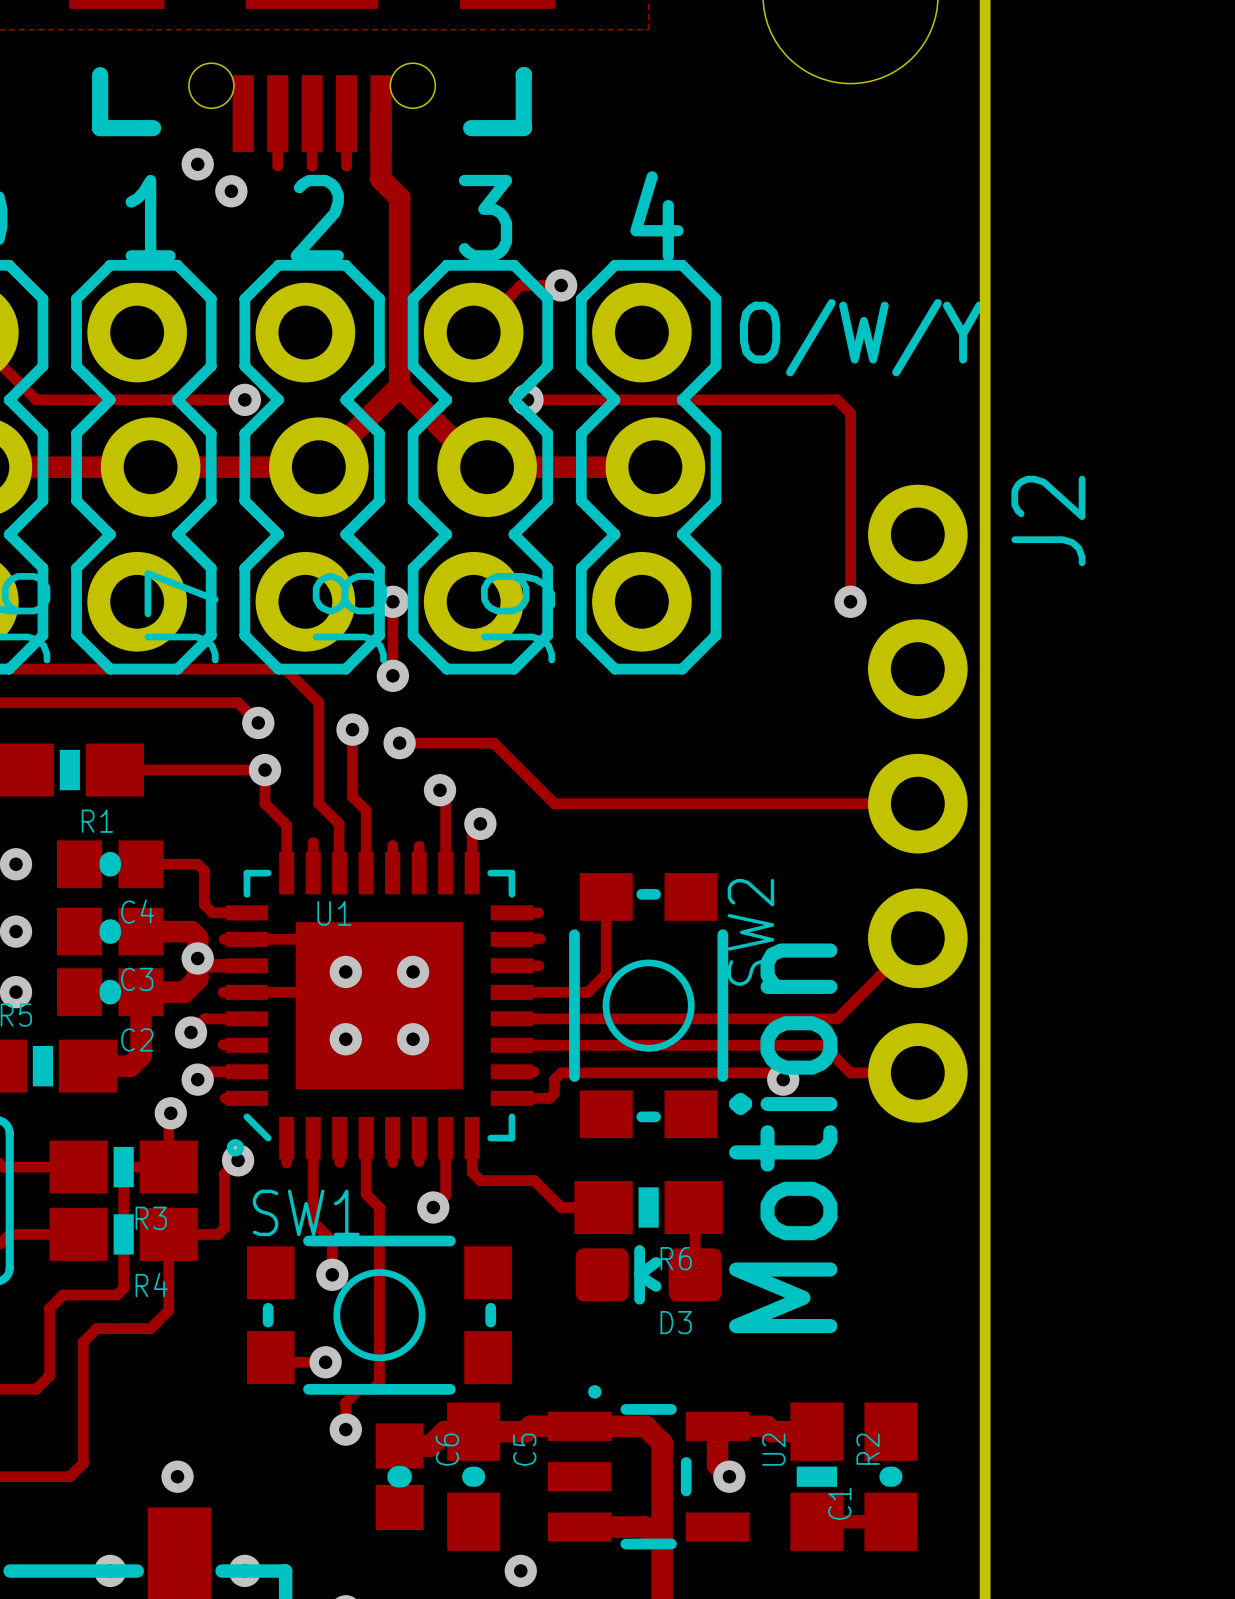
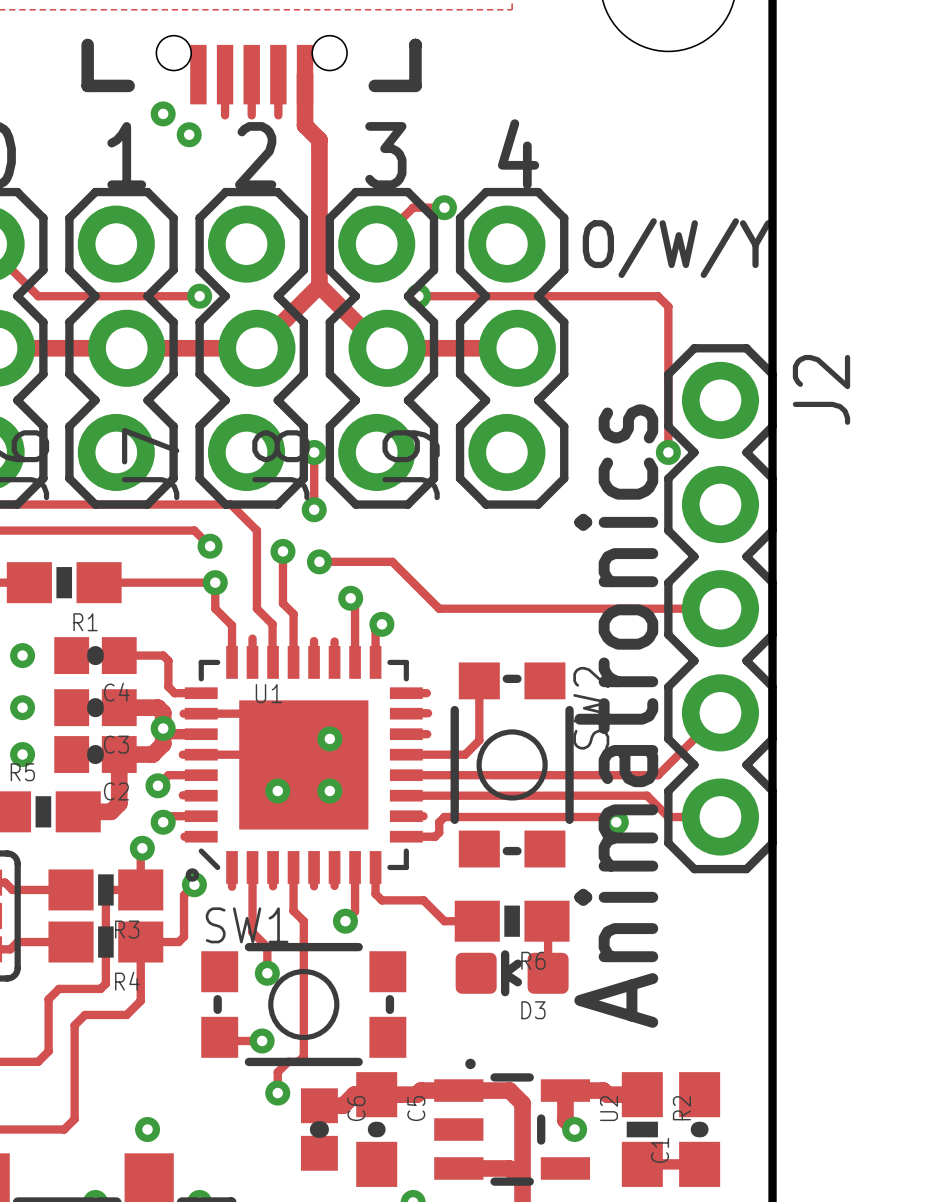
J2 footprint: [868, 484, 968, 1123] -> [664, 344, 777, 874]
via: (345, 971) -> none
text: Motion (783, 1138) -> Animatronics (616, 716)

